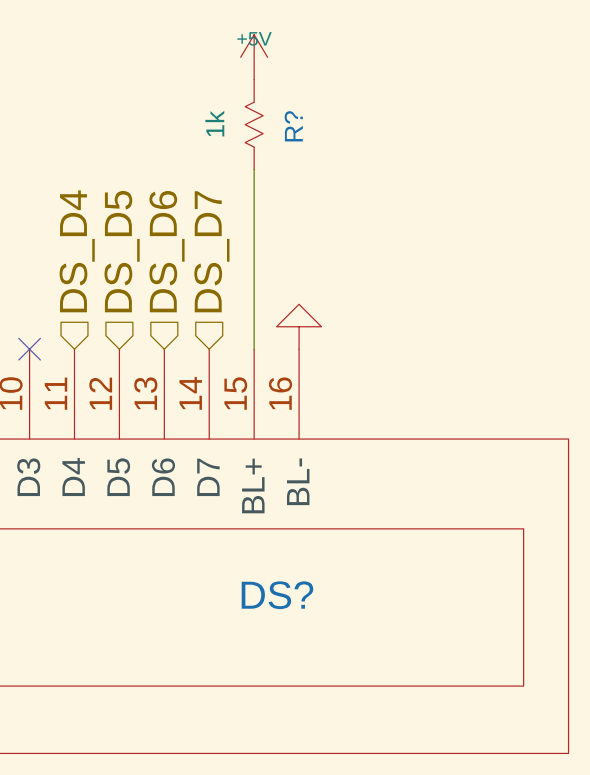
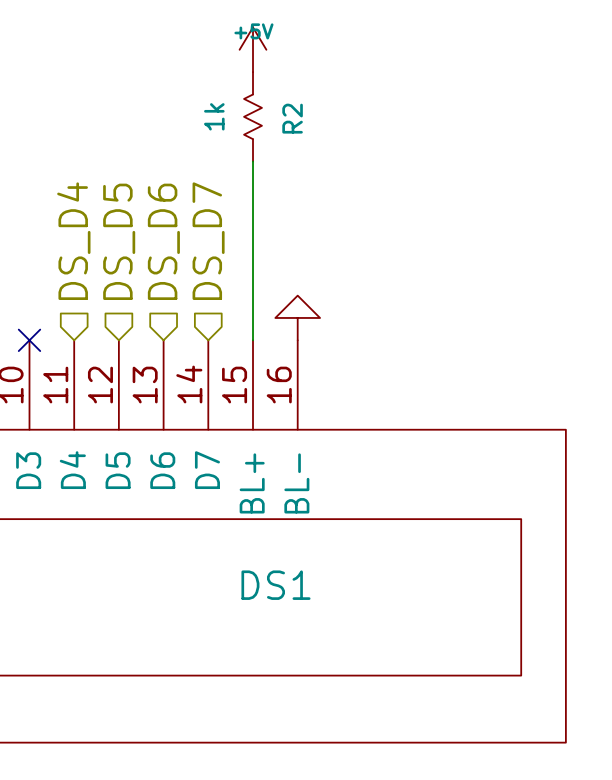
R? name: R? (293, 126) -> R2 (292, 118)
DS? name: DS? (277, 595) -> DS1 (275, 585)

